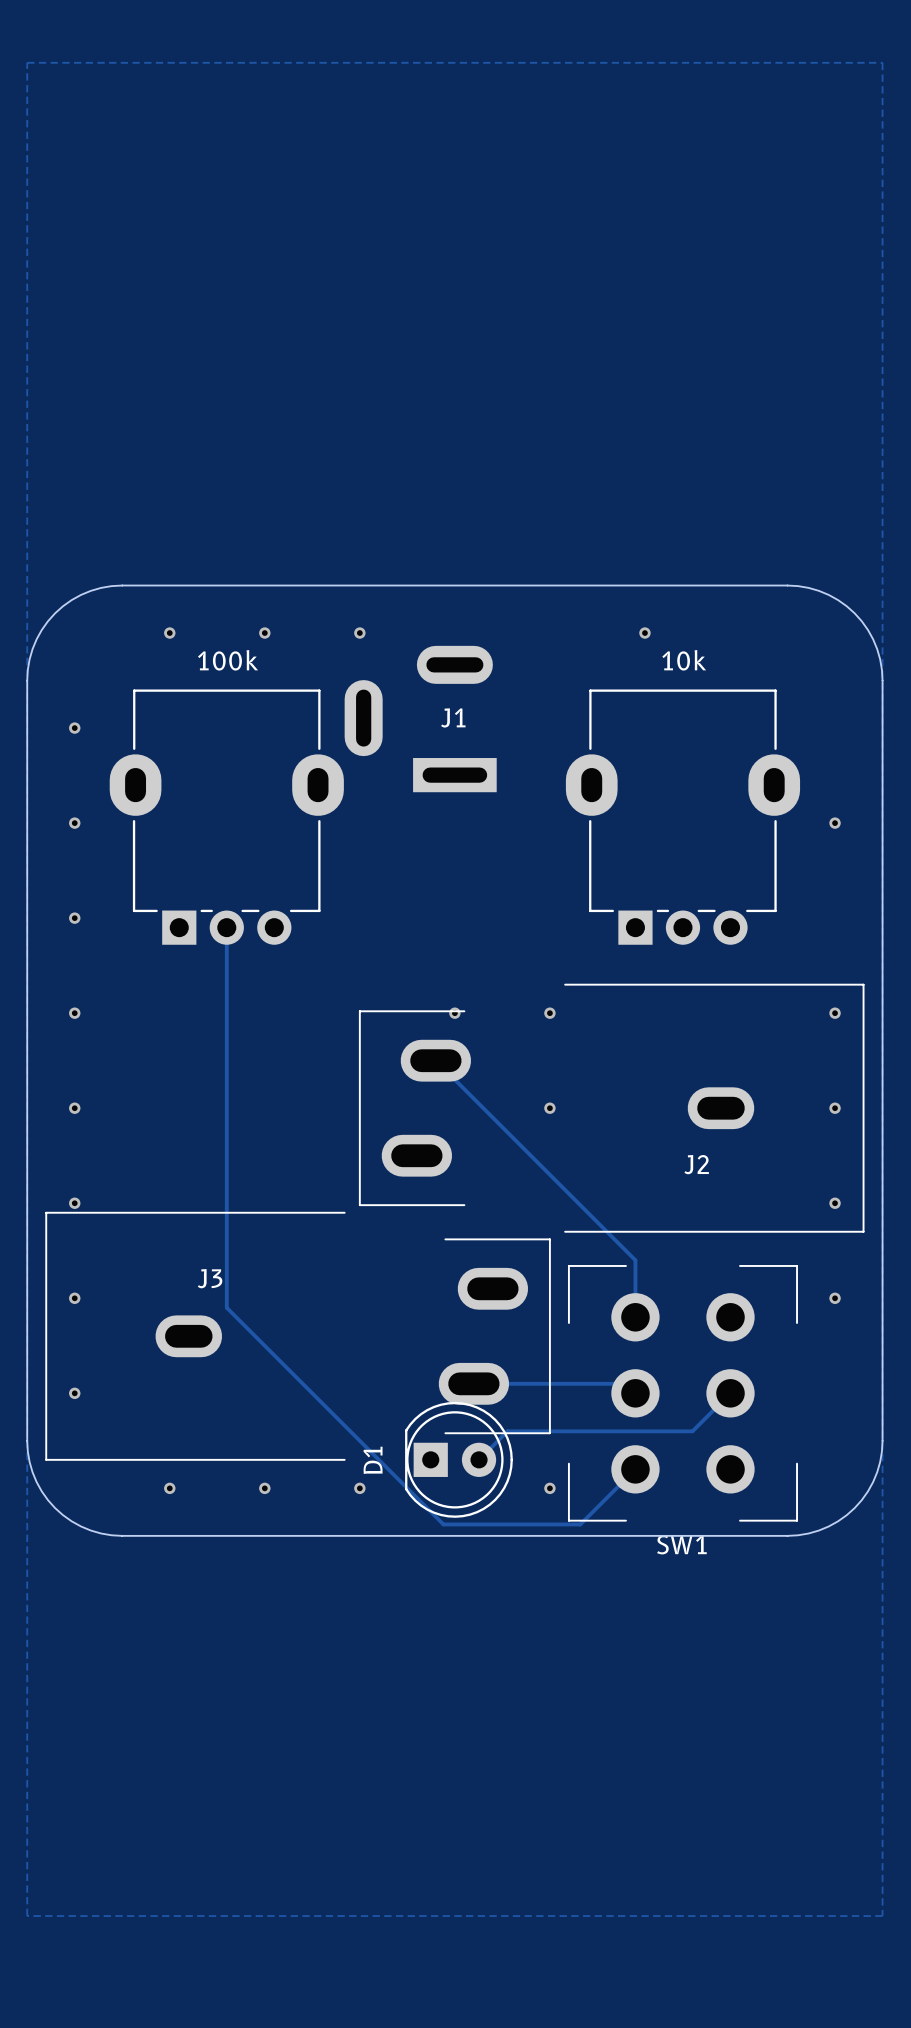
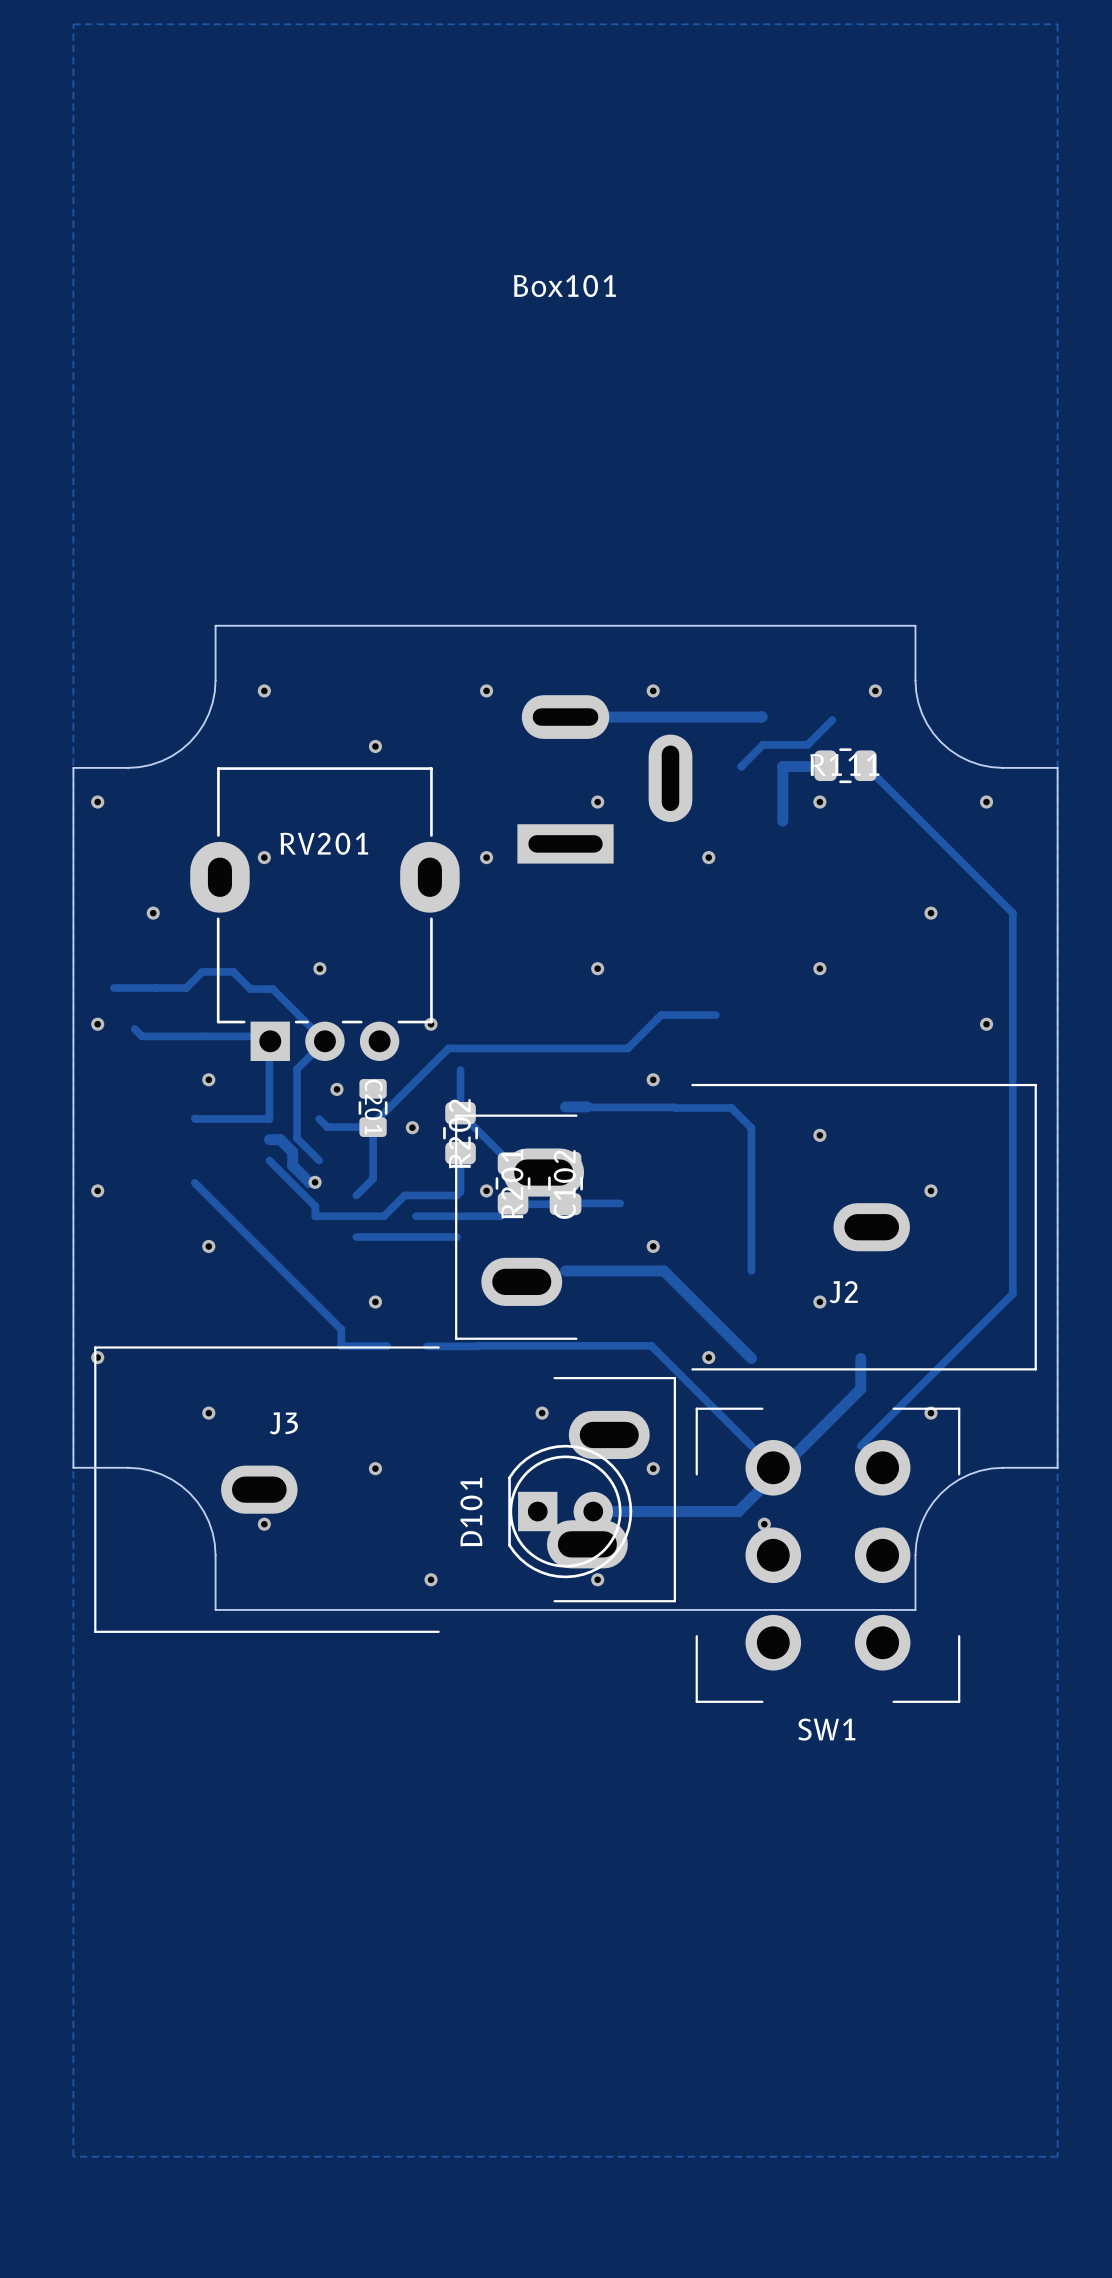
board edge: (150, 585) (111, 586) (90, 590) (71, 600) (55, 613) (41, 629) (32, 649) (27, 669) (27, 709) -> (215, 625) (215, 680) (212, 703) (203, 724) (189, 742) (171, 756) (150, 764) (128, 767) (73, 767)
board edge: (759, 585) (798, 586) (818, 590) (838, 600) (854, 613) (867, 629) (877, 649) (881, 669) (882, 709) -> (915, 625) (915, 680) (918, 703) (927, 724) (941, 742) (959, 756) (980, 764) (1002, 767) (1057, 767)
via position: (169, 633) -> (264, 690)
via: (264, 633) -> none
via position: (359, 633) -> (486, 690)
via: (644, 633) -> none
via: none -> (653, 690)
via: none -> (875, 690)
track: none -> (565, 717) (761, 717)
track: none -> (832, 720) (807, 744) (762, 744) (741, 766)
via: none -> (375, 746)
track: none -> (825, 765) (782, 766) (782, 821)
part: none -> (845, 765)
track: none -> (865, 765) (1012, 913) (1012, 1293) (860, 1445)
J1 side: top (420, 719) -> bottom (604, 779)
via position: (74, 728) -> (97, 802)
via: none -> (597, 802)
via: none -> (819, 802)
via: none -> (986, 802)
via: none -> (264, 857)
via: none -> (486, 857)
via: none -> (708, 857)
part: 100k (226, 817) -> none
part: 10k (682, 817) -> none
via position: (74, 823) -> (153, 913)
via: (835, 823) -> none
via: none -> (930, 913)
RV201: none -> (324, 914)
via: none -> (319, 968)
via: none -> (597, 968)
via: none -> (819, 968)
track: none -> (113, 987) (186, 987) (202, 971) (233, 971) (250, 989) (272, 989) (324, 1041) (297, 1069) (297, 1138) (319, 1160)
via position: (74, 918) -> (97, 1024)
track: none -> (715, 1015) (661, 1015) (627, 1048) (448, 1048) (373, 1123) (373, 1178) (356, 1195)
track: (226, 927) (226, 1307) (443, 1524) (580, 1524) (635, 1469) -> none
via: none -> (431, 1024)
via: none -> (986, 1024)
track: none -> (134, 1029) (142, 1036) (265, 1036) (270, 1041) (269, 1118) (194, 1118)
track: none -> (460, 1070) (460, 1113) (510, 1163) (513, 1163)
via: none -> (208, 1079)
via: none -> (336, 1089)
track: none -> (587, 1106) (565, 1106) (731, 1108) (751, 1127) (751, 1270)
part: none -> (373, 1108)
via: (74, 1013) -> none
via: (454, 1013) -> none
via position: (549, 1013) -> (653, 1079)
via: (835, 1013) -> none
track: none -> (319, 1118) (327, 1127) (373, 1127)
via: none -> (412, 1127)
part: none -> (460, 1133)
via: none -> (819, 1135)
track: none -> (269, 1139) (280, 1139) (292, 1152) (292, 1165) (309, 1182) (315, 1182)
track: none -> (460, 1153) (460, 1191) (456, 1195) (404, 1195) (383, 1216) (315, 1216) (315, 1206) (269, 1160)
track: (435, 1060) (635, 1260) (635, 1317) -> none
track: none -> (194, 1182) (341, 1329) (341, 1346) (386, 1346)
via: none -> (315, 1182)
part: none -> (513, 1183)
part: none -> (565, 1183)
via: none -> (97, 1190)
via: none -> (486, 1190)
via: none -> (930, 1190)
track: none -> (620, 1203) (513, 1203) (500, 1216) (415, 1216)
via: (74, 1108) -> none
via position: (549, 1108) -> (653, 1246)
via: (835, 1108) -> none
track: none -> (356, 1237) (456, 1237)
via: none -> (208, 1246)
track: none -> (565, 1270) (663, 1270) (751, 1358)
via: none -> (375, 1302)
via: none -> (819, 1302)
via position: (74, 1203) -> (97, 1357)
via: (835, 1203) -> none
track: none -> (426, 1346) (651, 1345) (751, 1445)
via: none -> (708, 1357)
track: none -> (860, 1358) (860, 1389) (738, 1511) (593, 1511)
via: none -> (208, 1413)
via: none -> (542, 1413)
via: none -> (930, 1413)
via: (74, 1298) -> none
via: (835, 1298) -> none
board edge: (27, 1317) (27, 1451) (36, 1482) (55, 1508) (71, 1521) (90, 1530) (122, 1535) (787, 1535) (808, 1533) (828, 1526) (854, 1508) (867, 1491) (877, 1472) (882, 1440) (882, 1317) -> (73, 1467) (128, 1467) (150, 1470) (171, 1479) (189, 1493) (203, 1511) (212, 1532) (215, 1555) (215, 1609) (915, 1609) (915, 1555) (918, 1532) (927, 1511) (941, 1493) (959, 1479) (980, 1470) (1002, 1467) (1057, 1467)
via: none -> (375, 1468)
via: none -> (653, 1468)
D101: none -> (570, 1511)
via: none -> (264, 1524)
via: none -> (764, 1524)
track: (473, 1383) (625, 1383) (635, 1393) -> none
via: (74, 1393) -> none
track: (730, 1393) (692, 1431) (507, 1431) (479, 1459) -> none
via: none -> (431, 1579)
via: none -> (597, 1579)
D1: (458, 1459) -> none
via: (169, 1488) -> none
via: (264, 1488) -> none
via: (359, 1488) -> none
via: (549, 1488) -> none
Box101: none -> (566, 2219)

